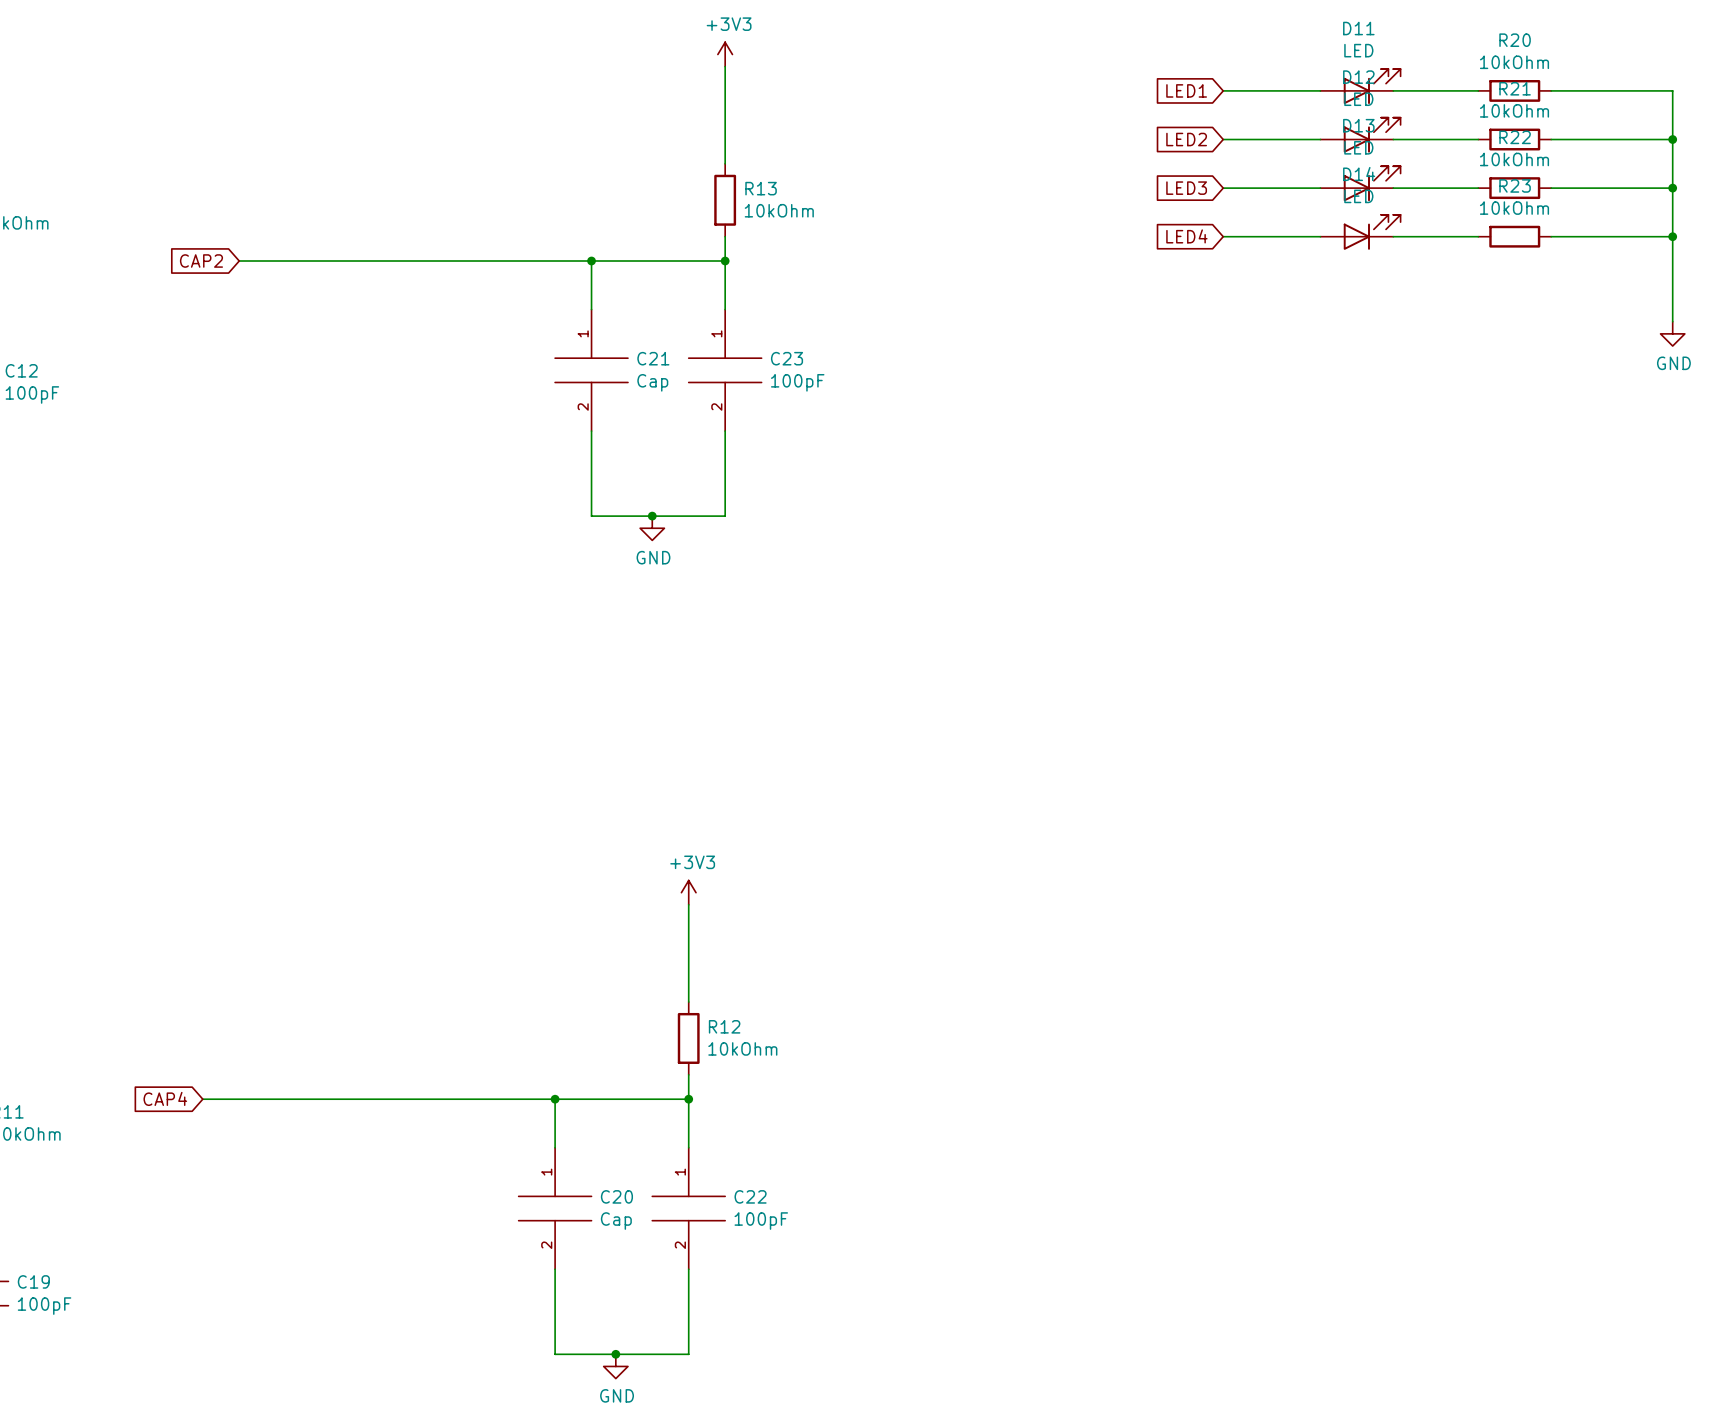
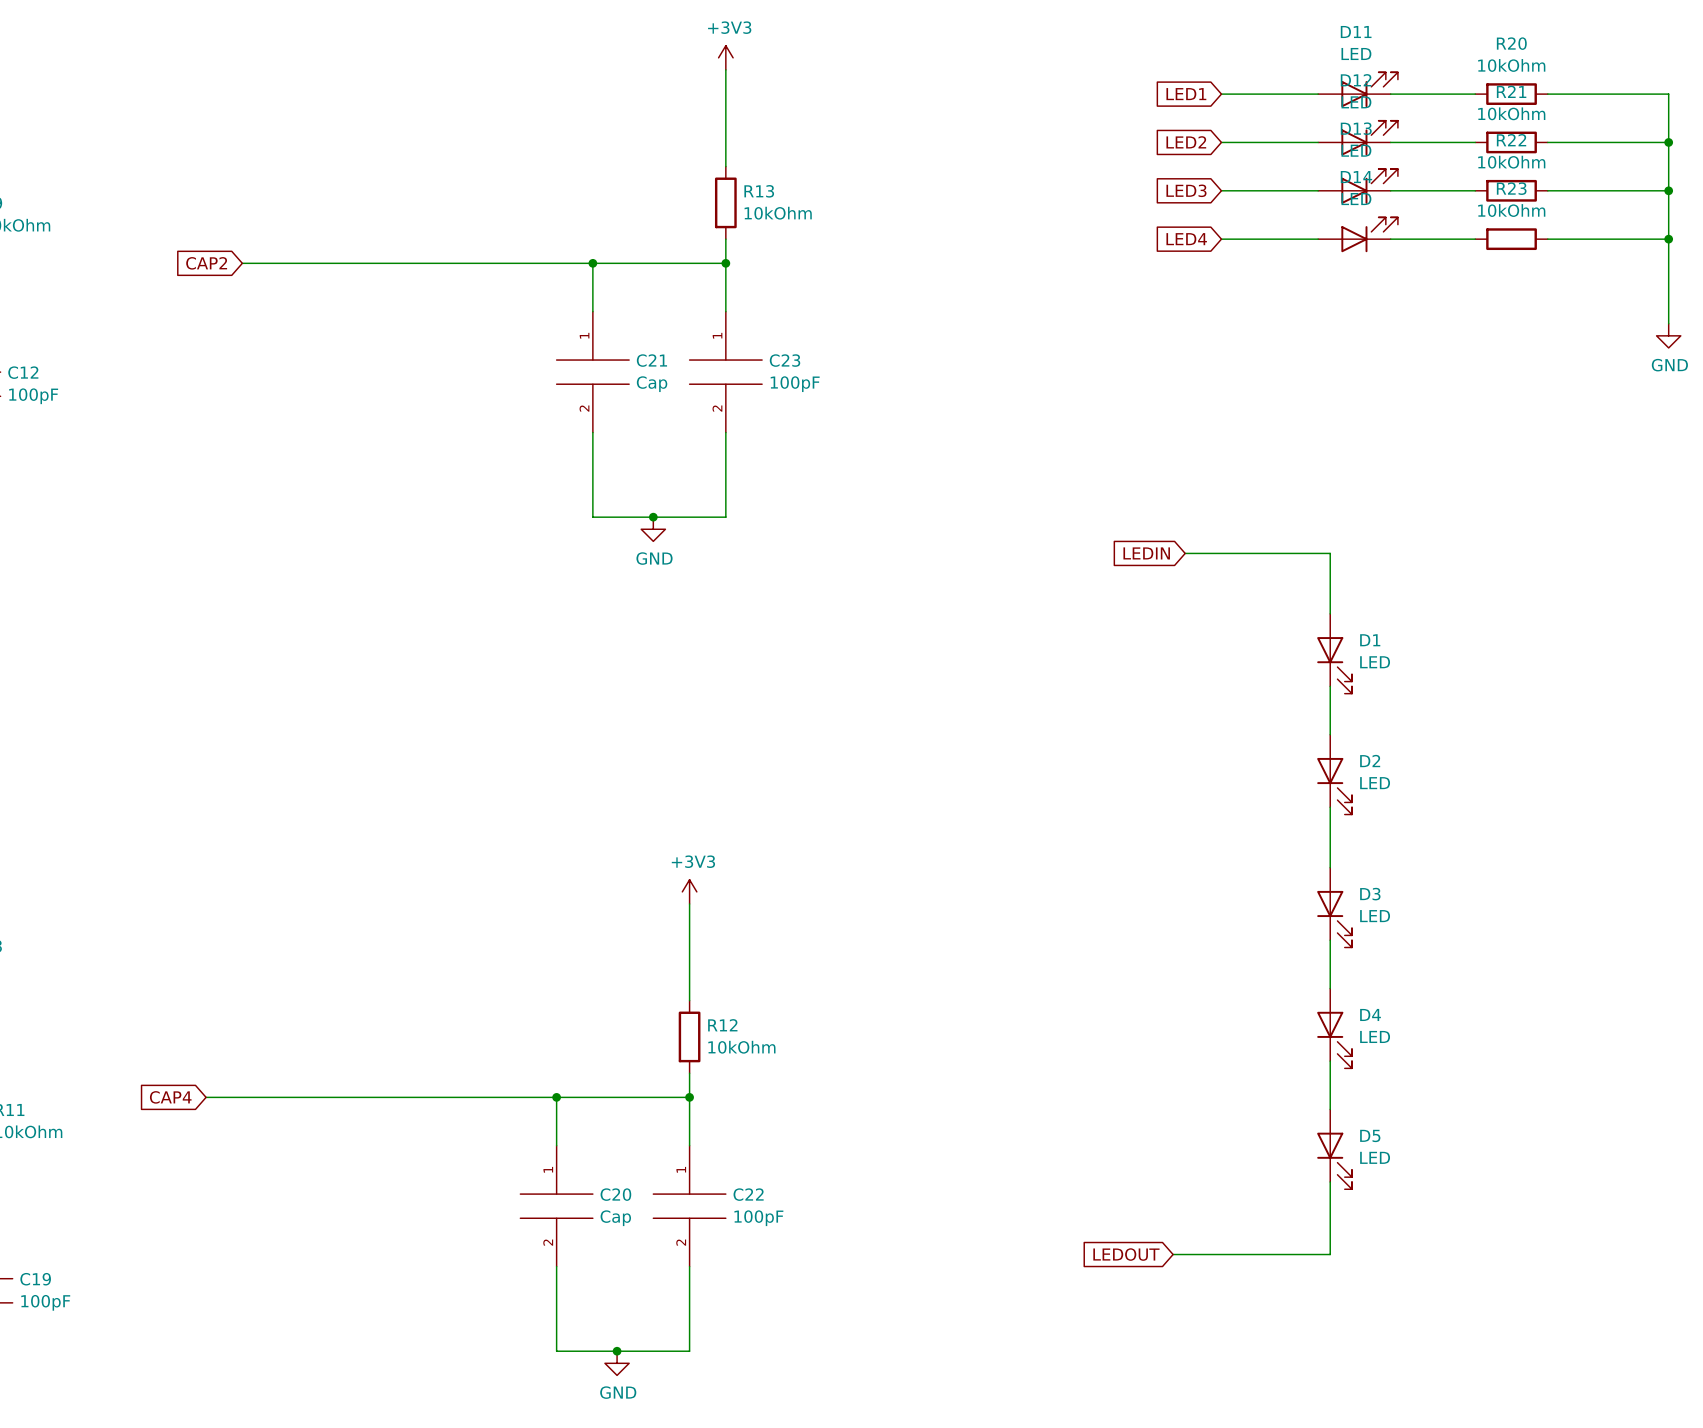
global label: none -> LEDIN (1146, 553)
wire: none -> (1185, 553) (1330, 553) (1330, 613)
D1: none -> LED (1334, 653)
wire: none -> (1330, 686) (1330, 734)
D2: none -> LED (1334, 774)
wire: none -> (1330, 807) (1330, 867)
D3: none -> LED (1334, 907)
wire: none -> (1330, 940) (1330, 988)
D4: none -> LED (1334, 1028)
wire: none -> (1330, 1061) (1330, 1109)
D5: none -> LED (1334, 1149)
wire: none -> (1330, 1181) (1330, 1254) (1173, 1254)
global label: none -> LEDOUT (1126, 1254)

